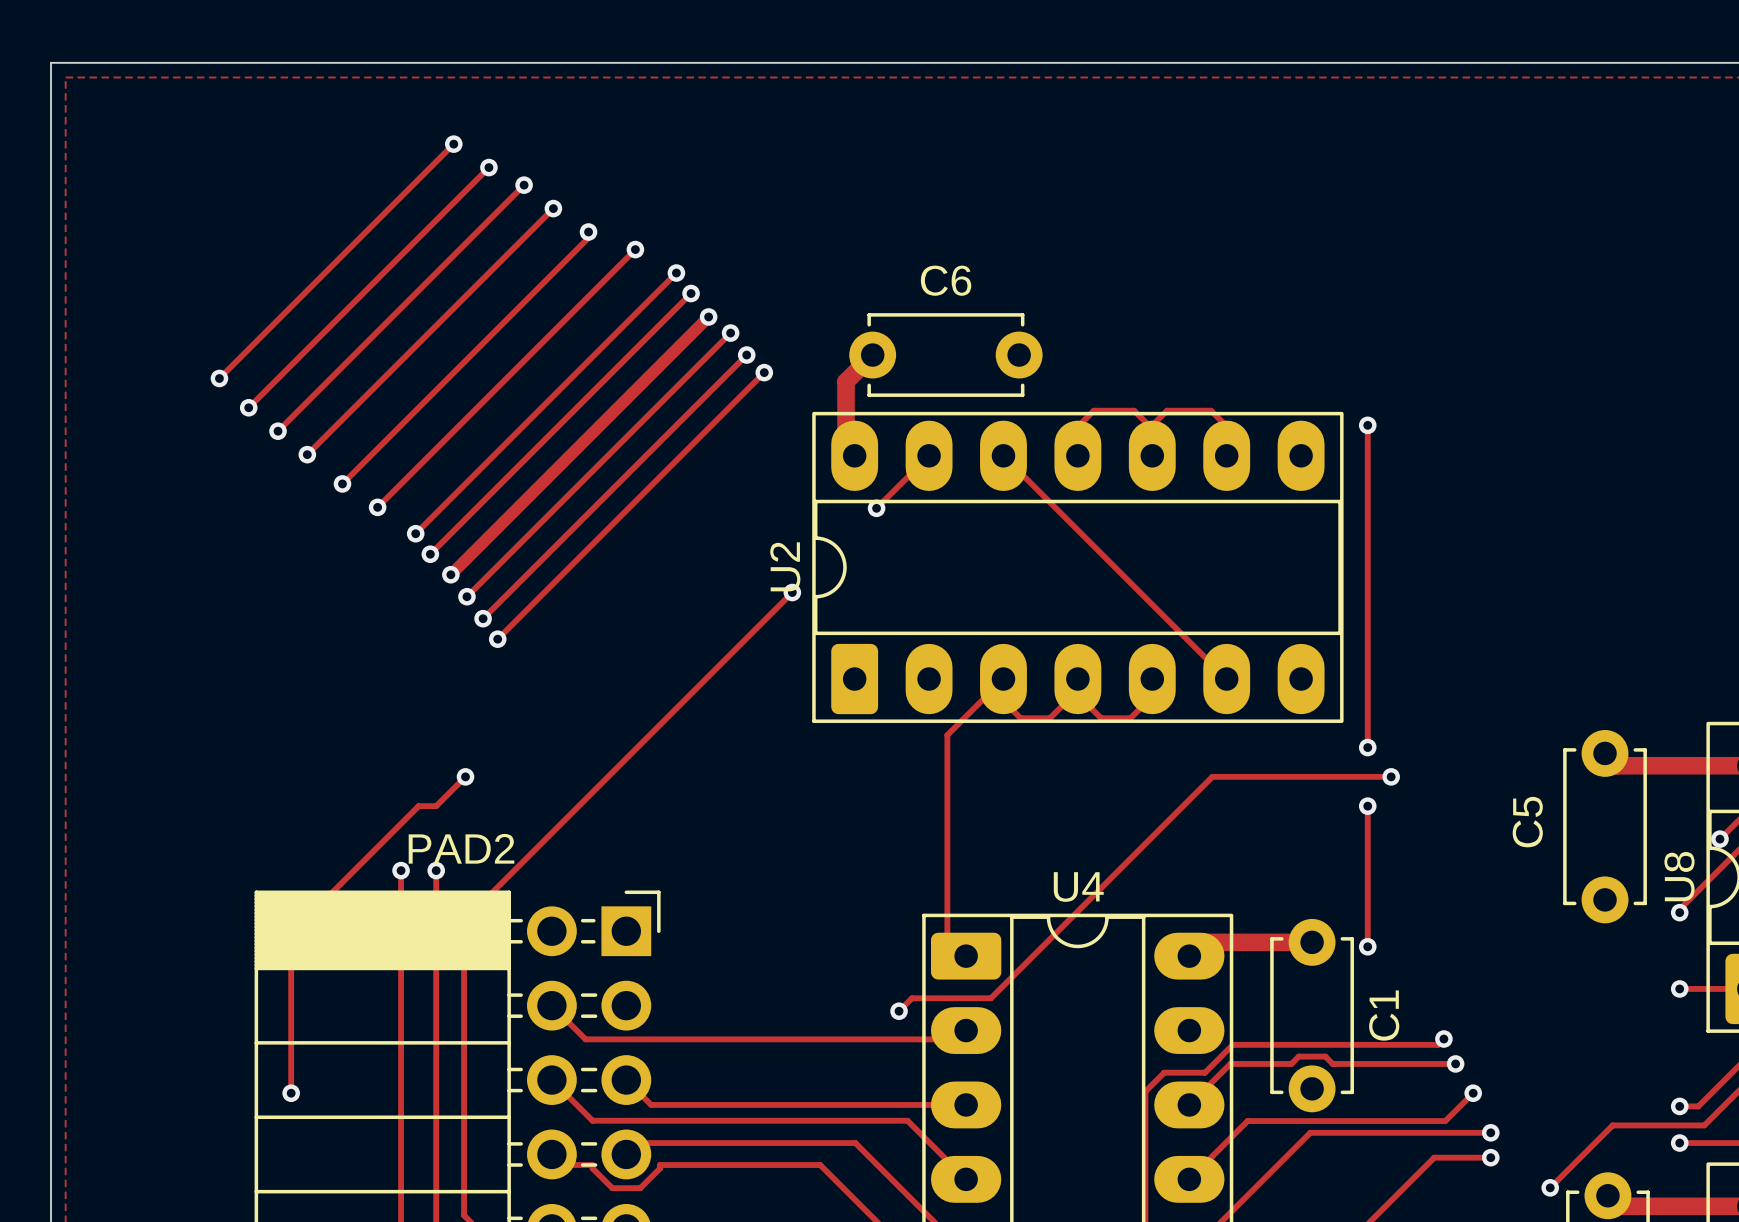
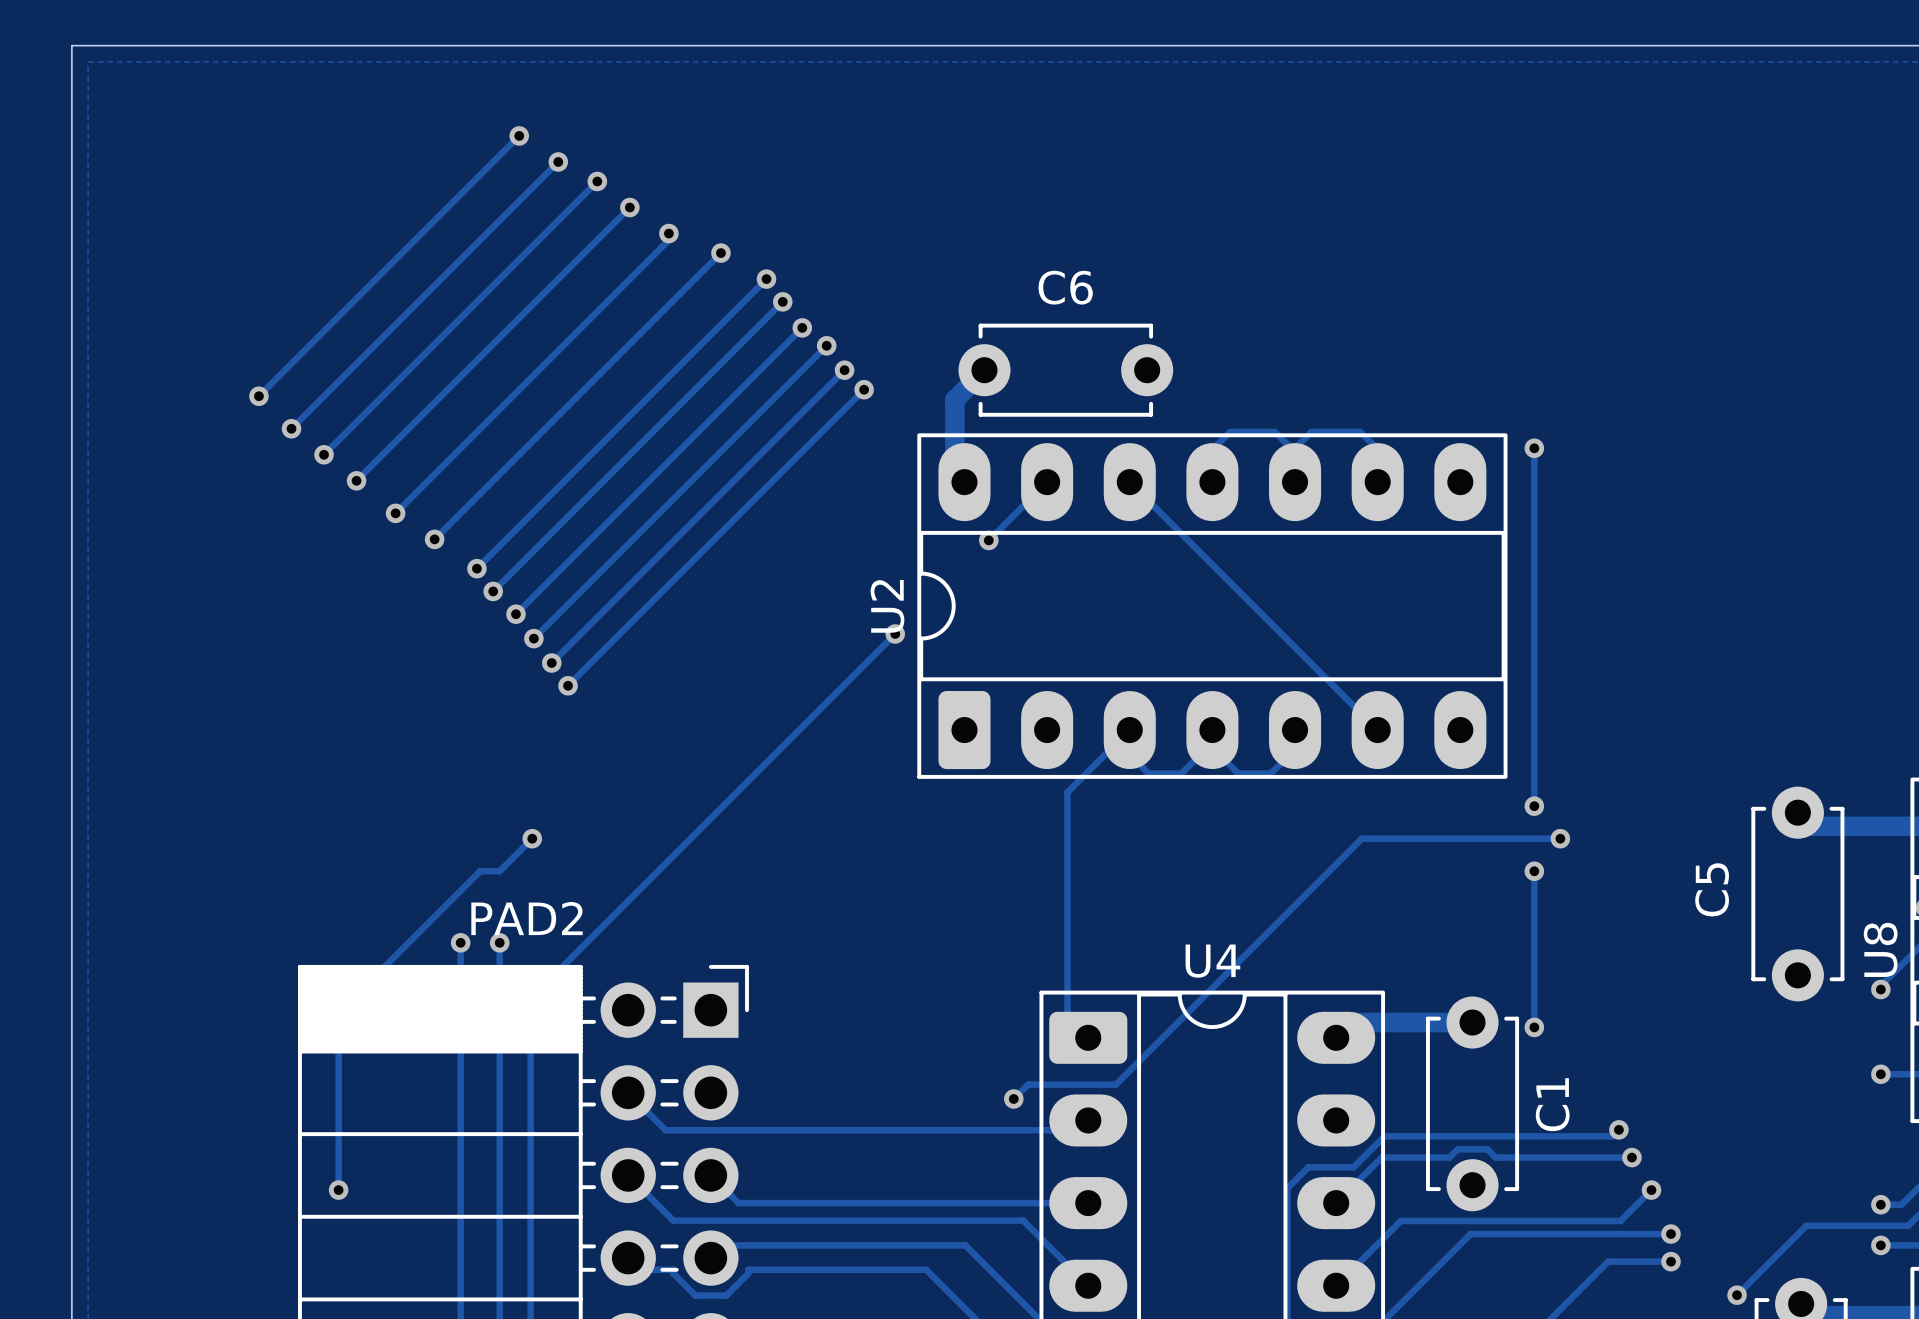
track width: thick (708, 316) (450, 574) -> thin (802, 327) (515, 614)

